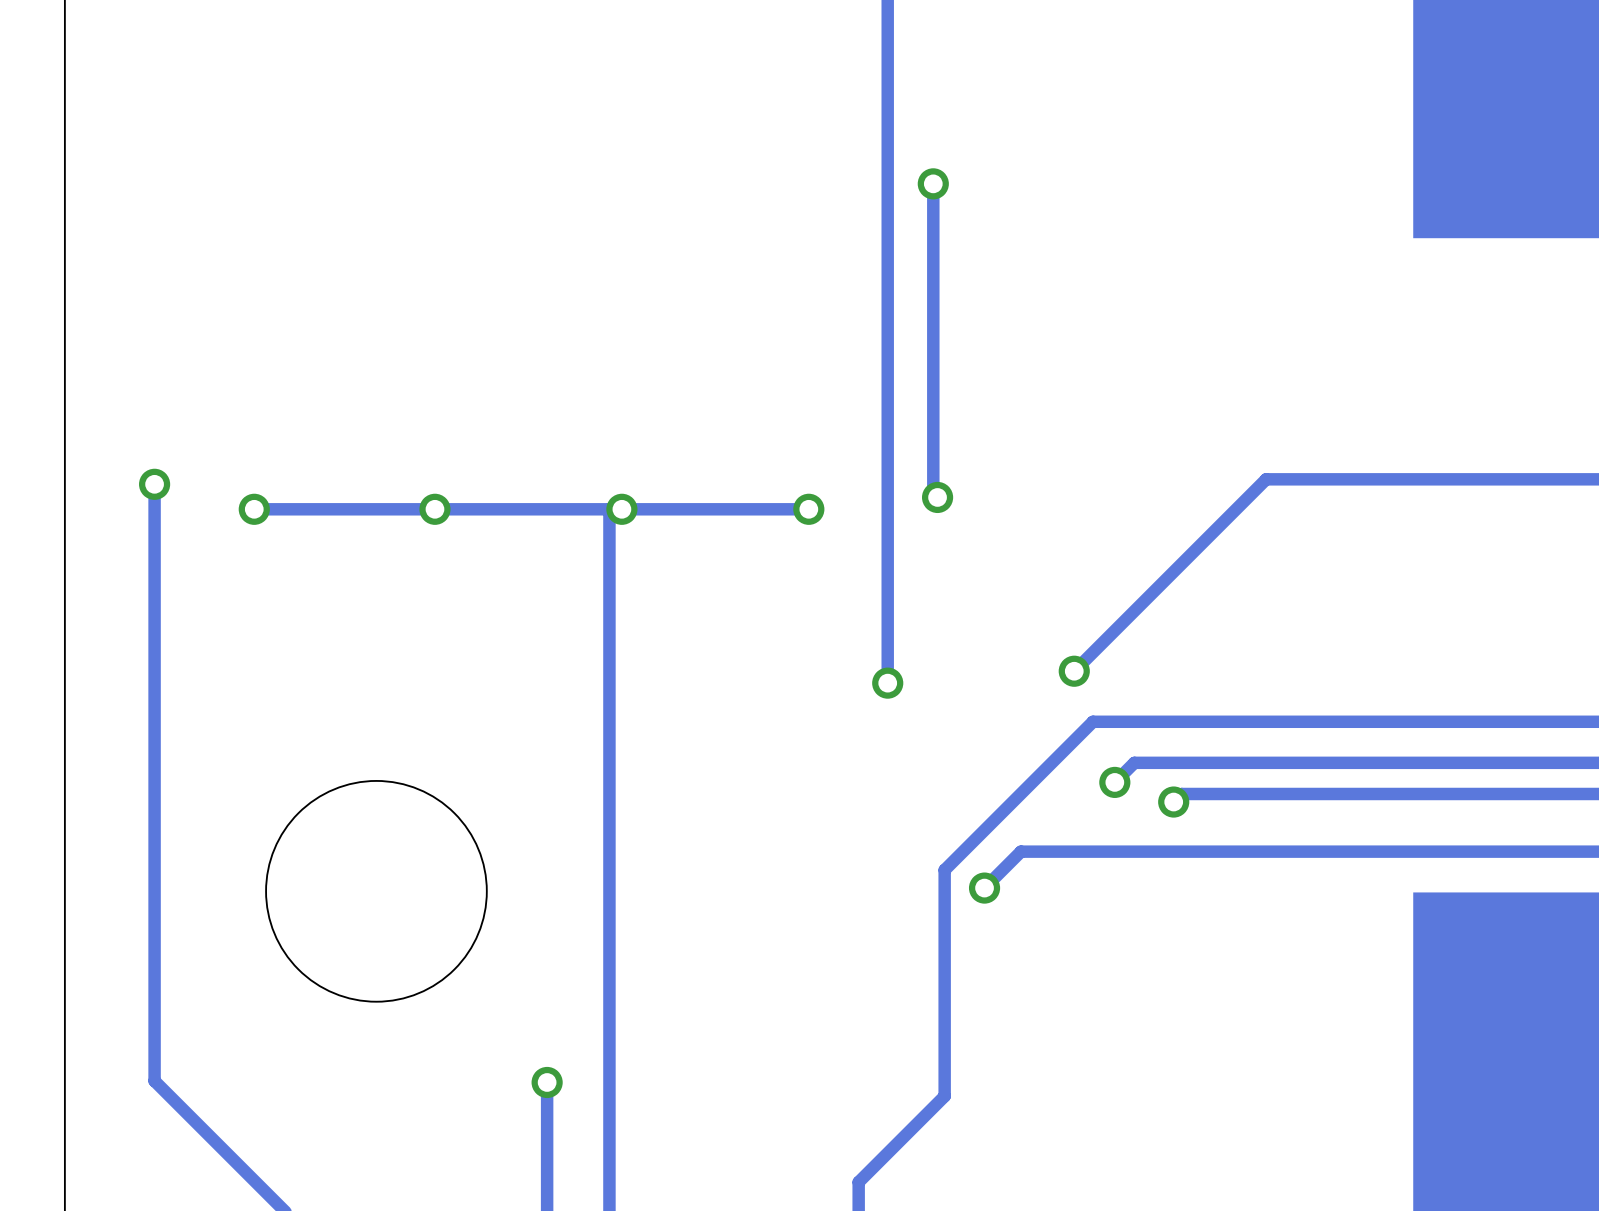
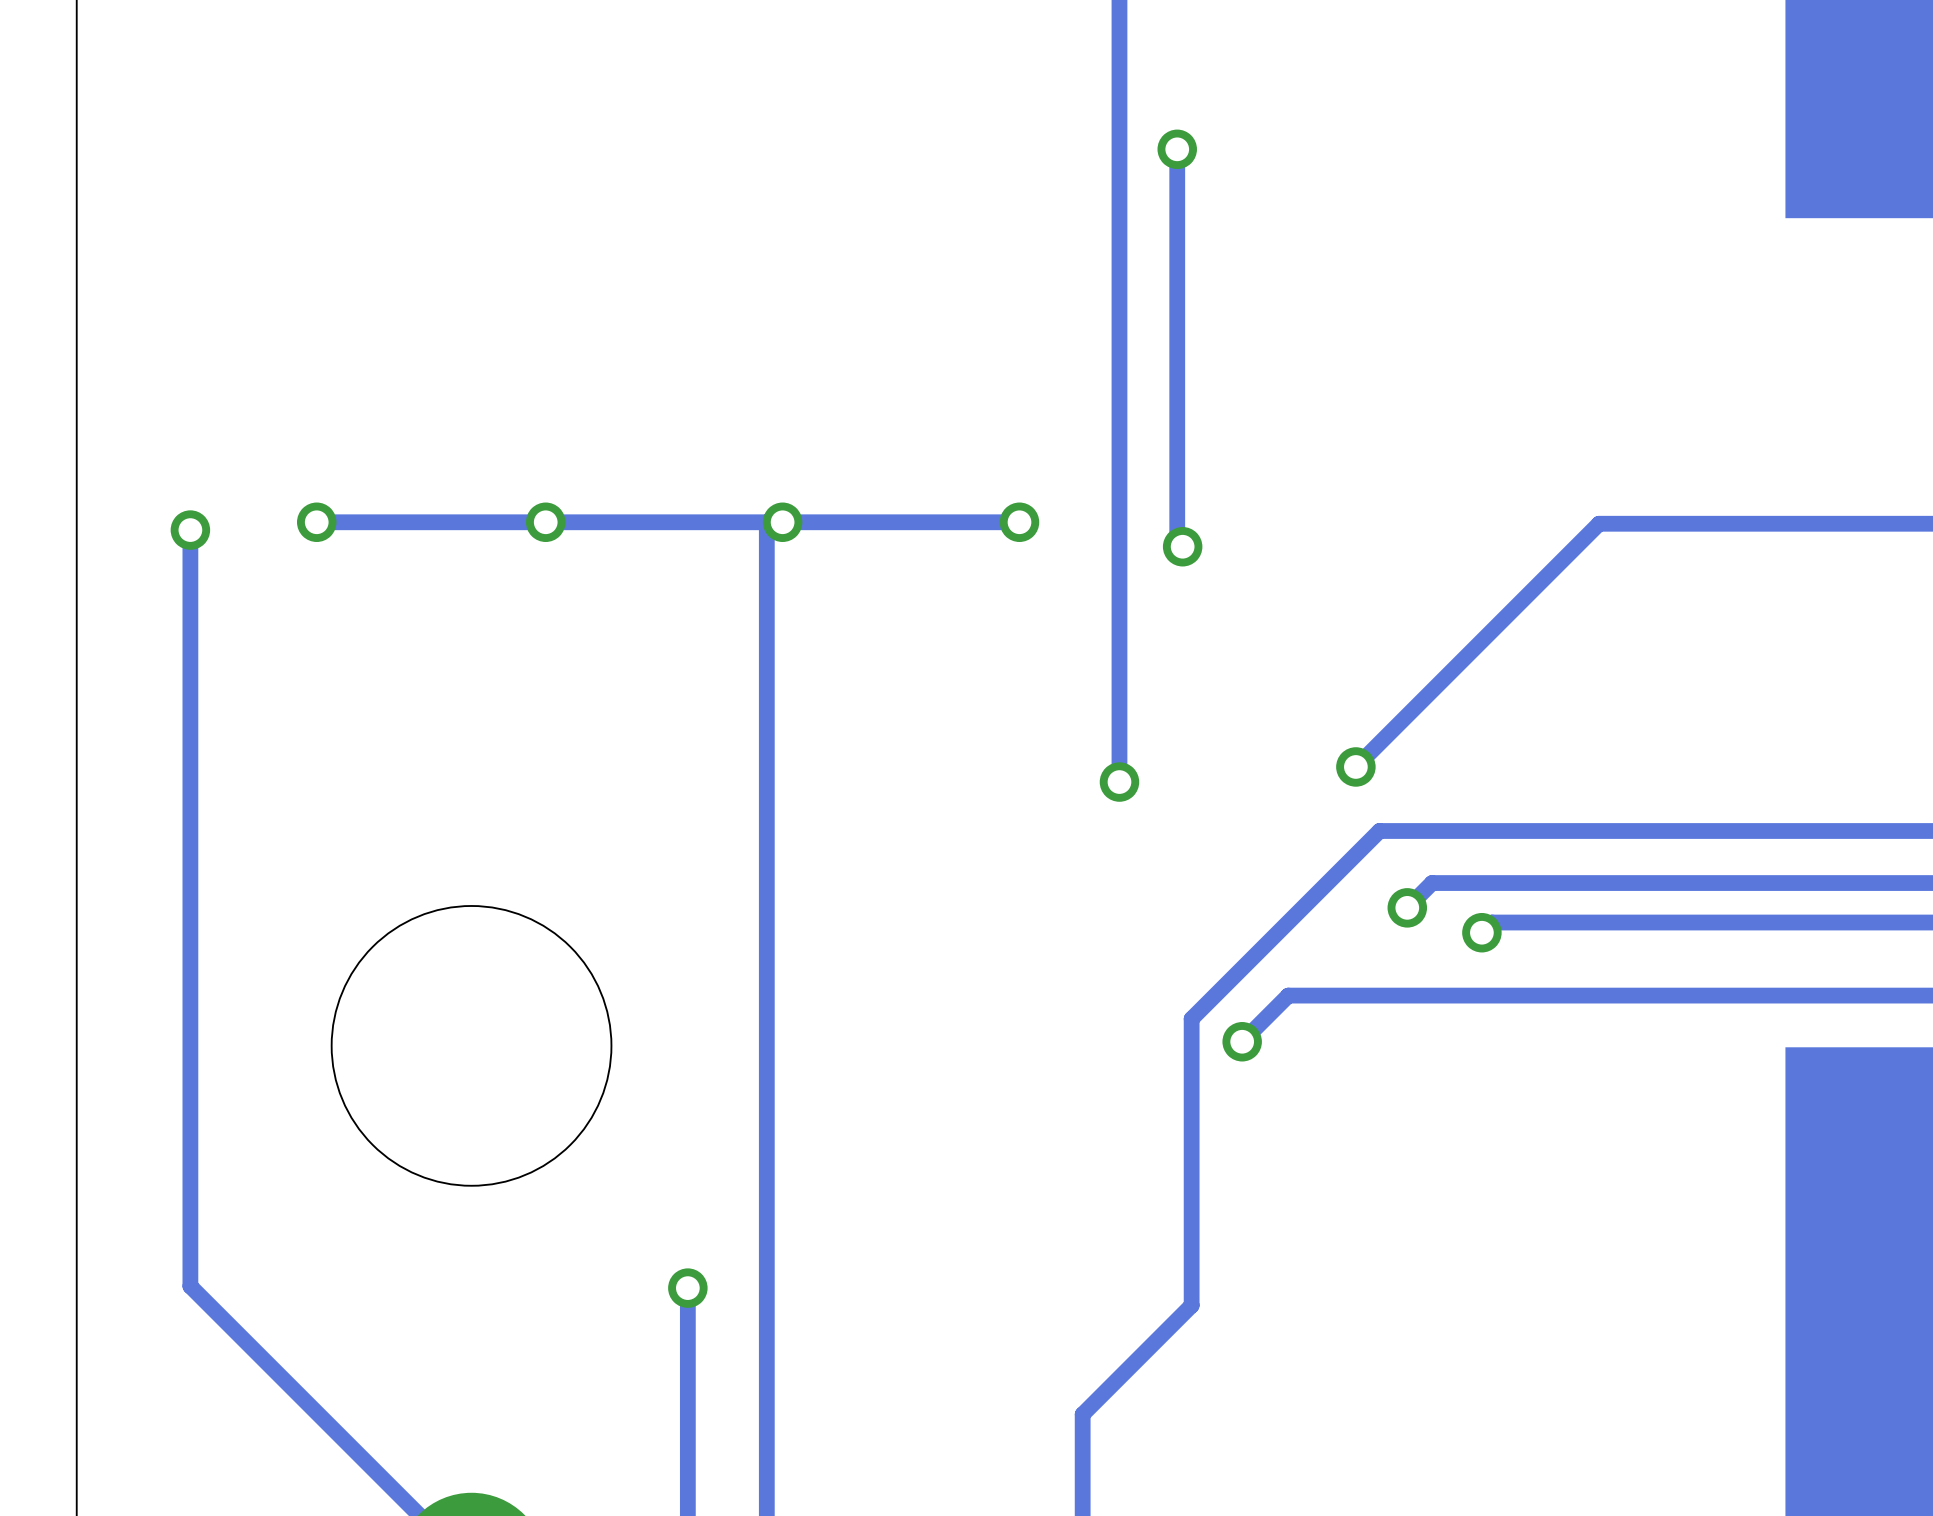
track: none -> (766, 522) (766, 561)
via position: (254, 509) -> (316, 522)
via position: (434, 509) -> (545, 522)
via position: (621, 509) -> (782, 522)
track: (808, 509) (254, 509) -> (1019, 522) (316, 522)
via position: (808, 509) -> (1019, 522)

